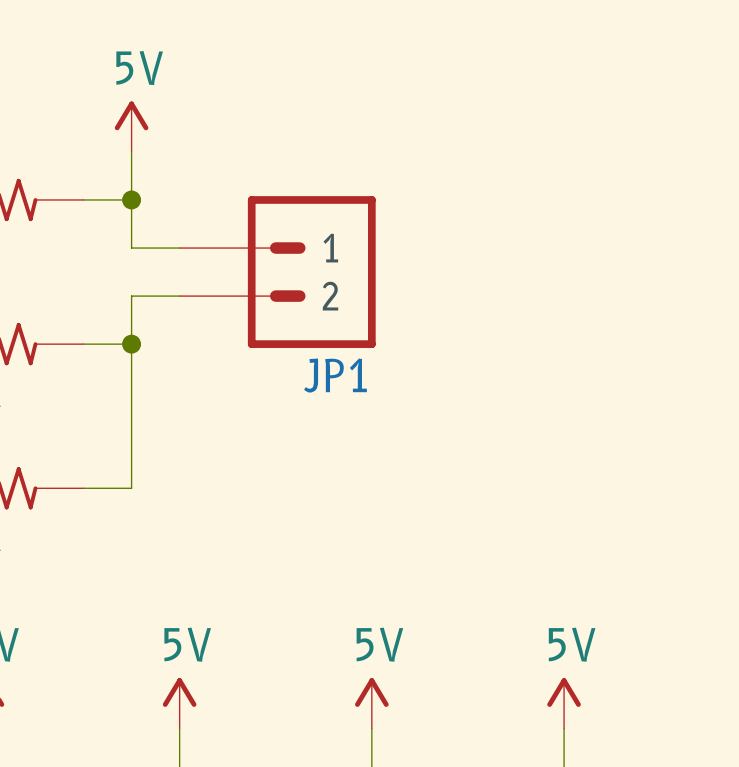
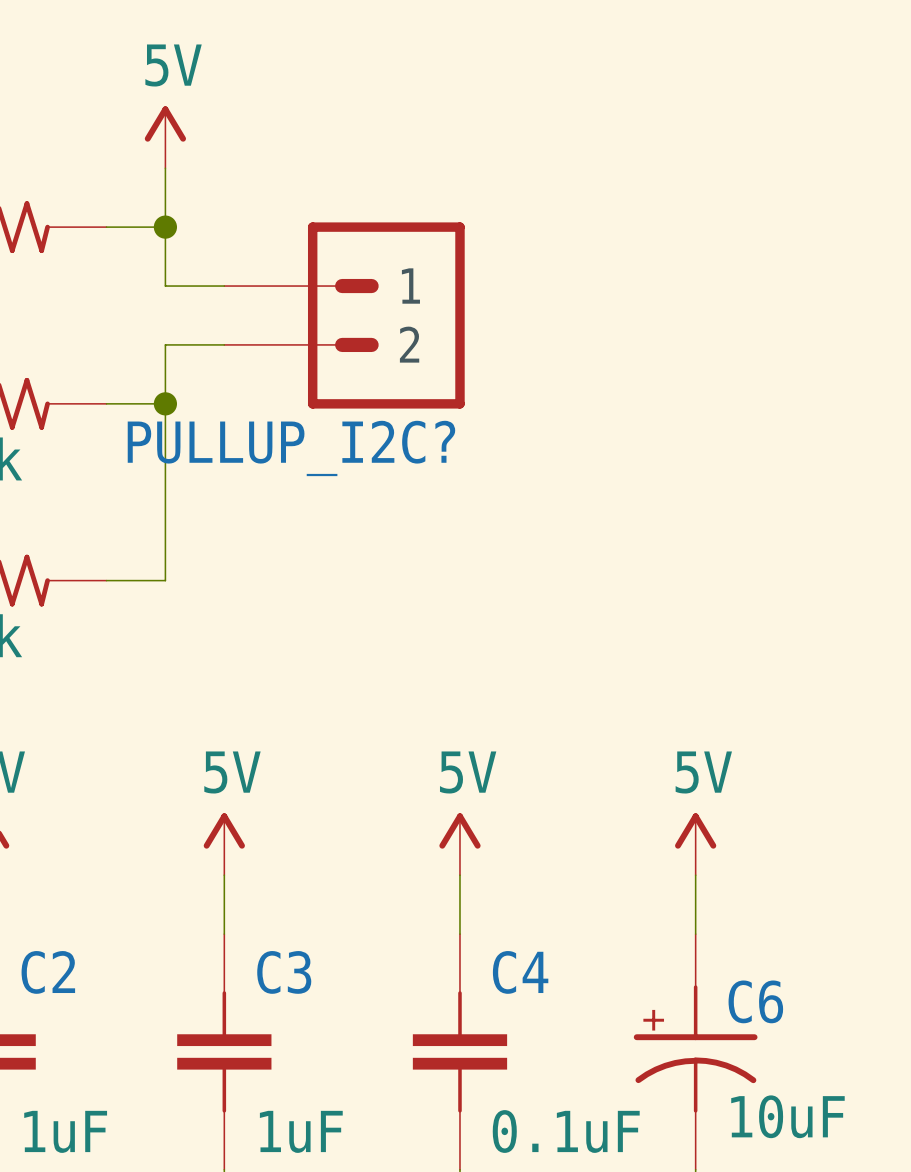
JP1 name: JP1 (335, 375) -> PULLUP_I2C? (291, 448)

